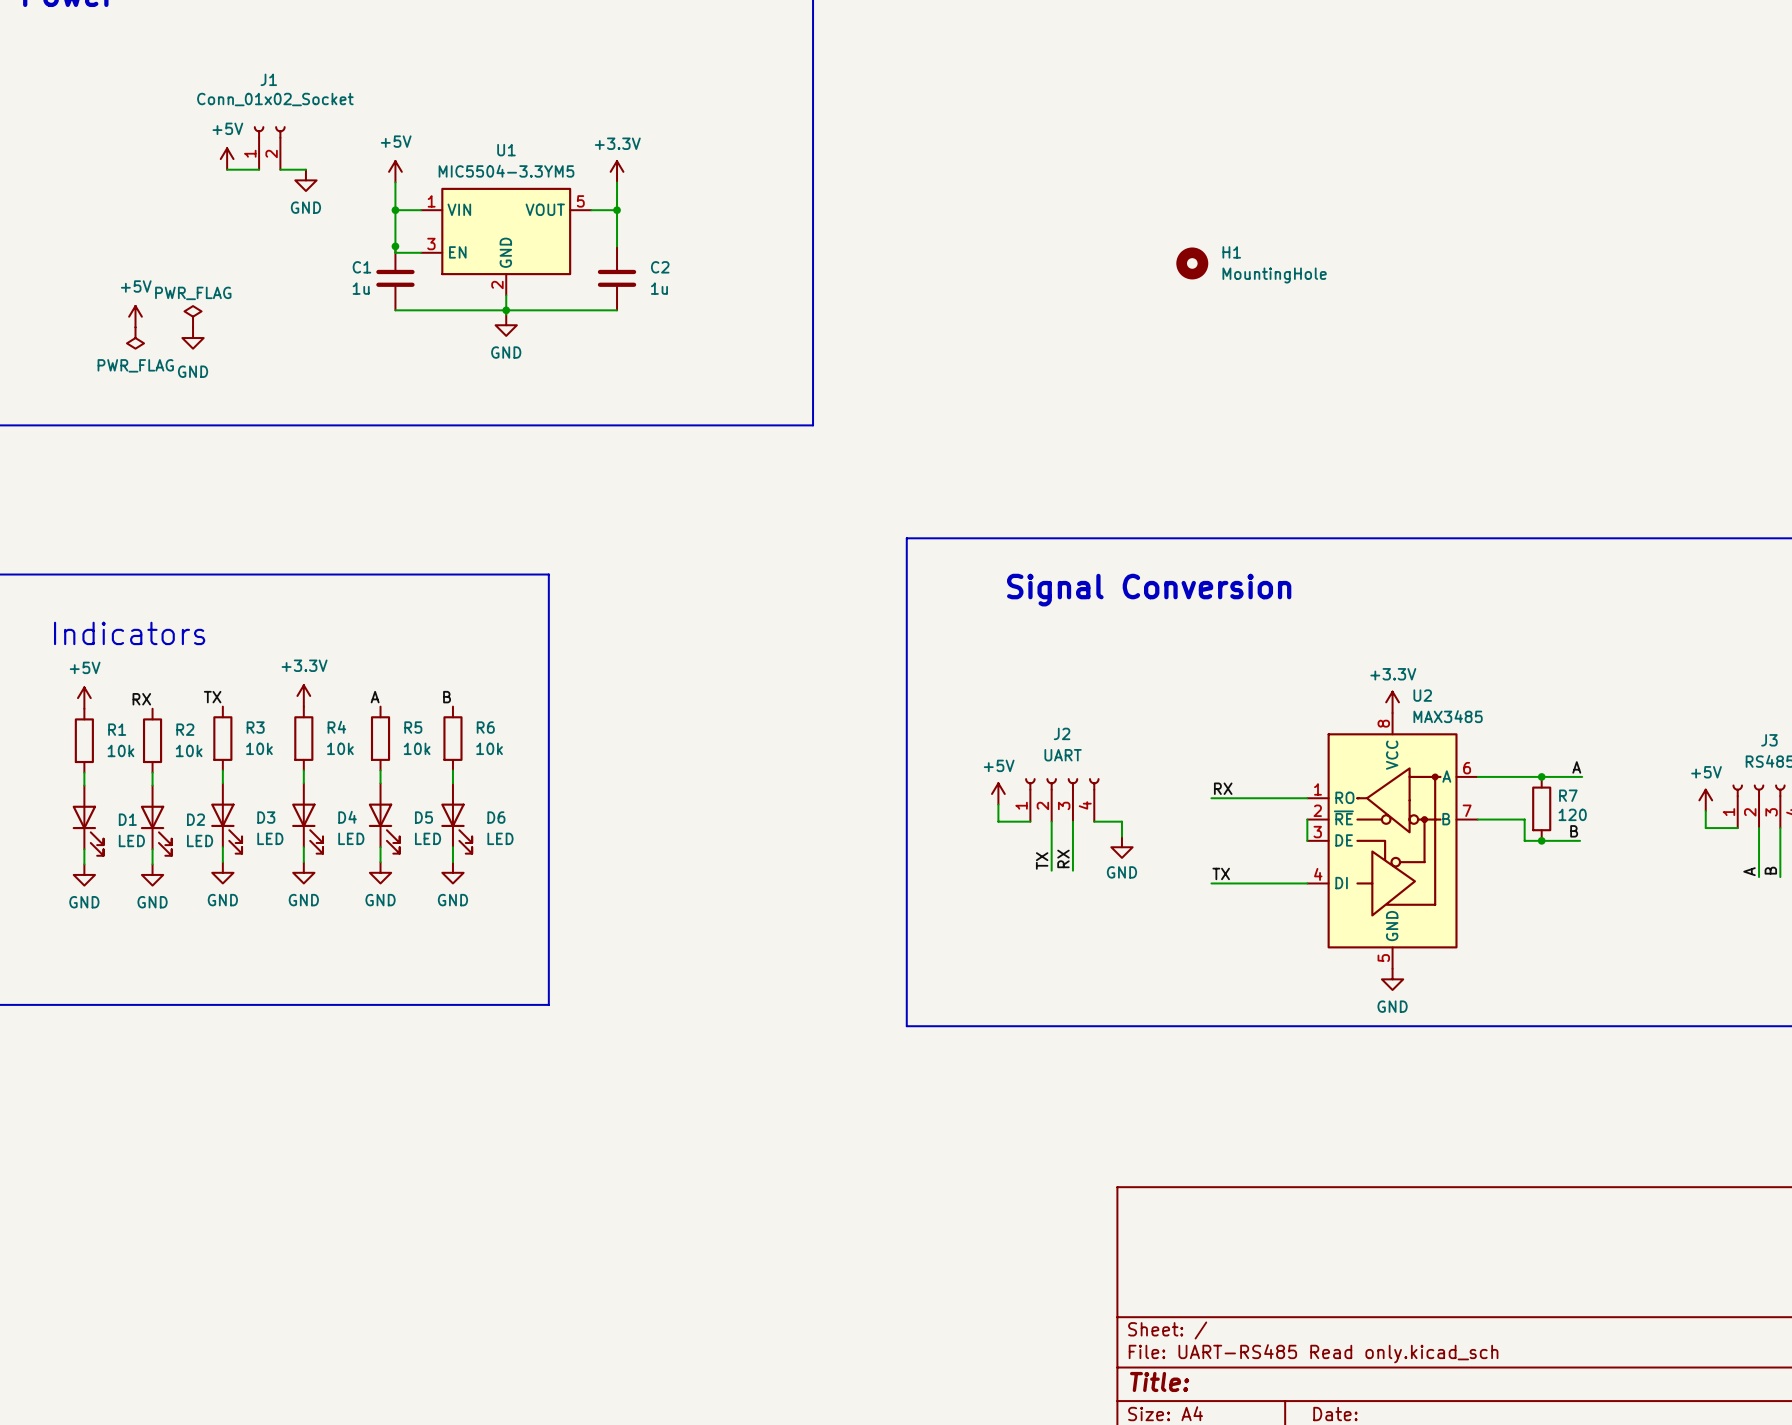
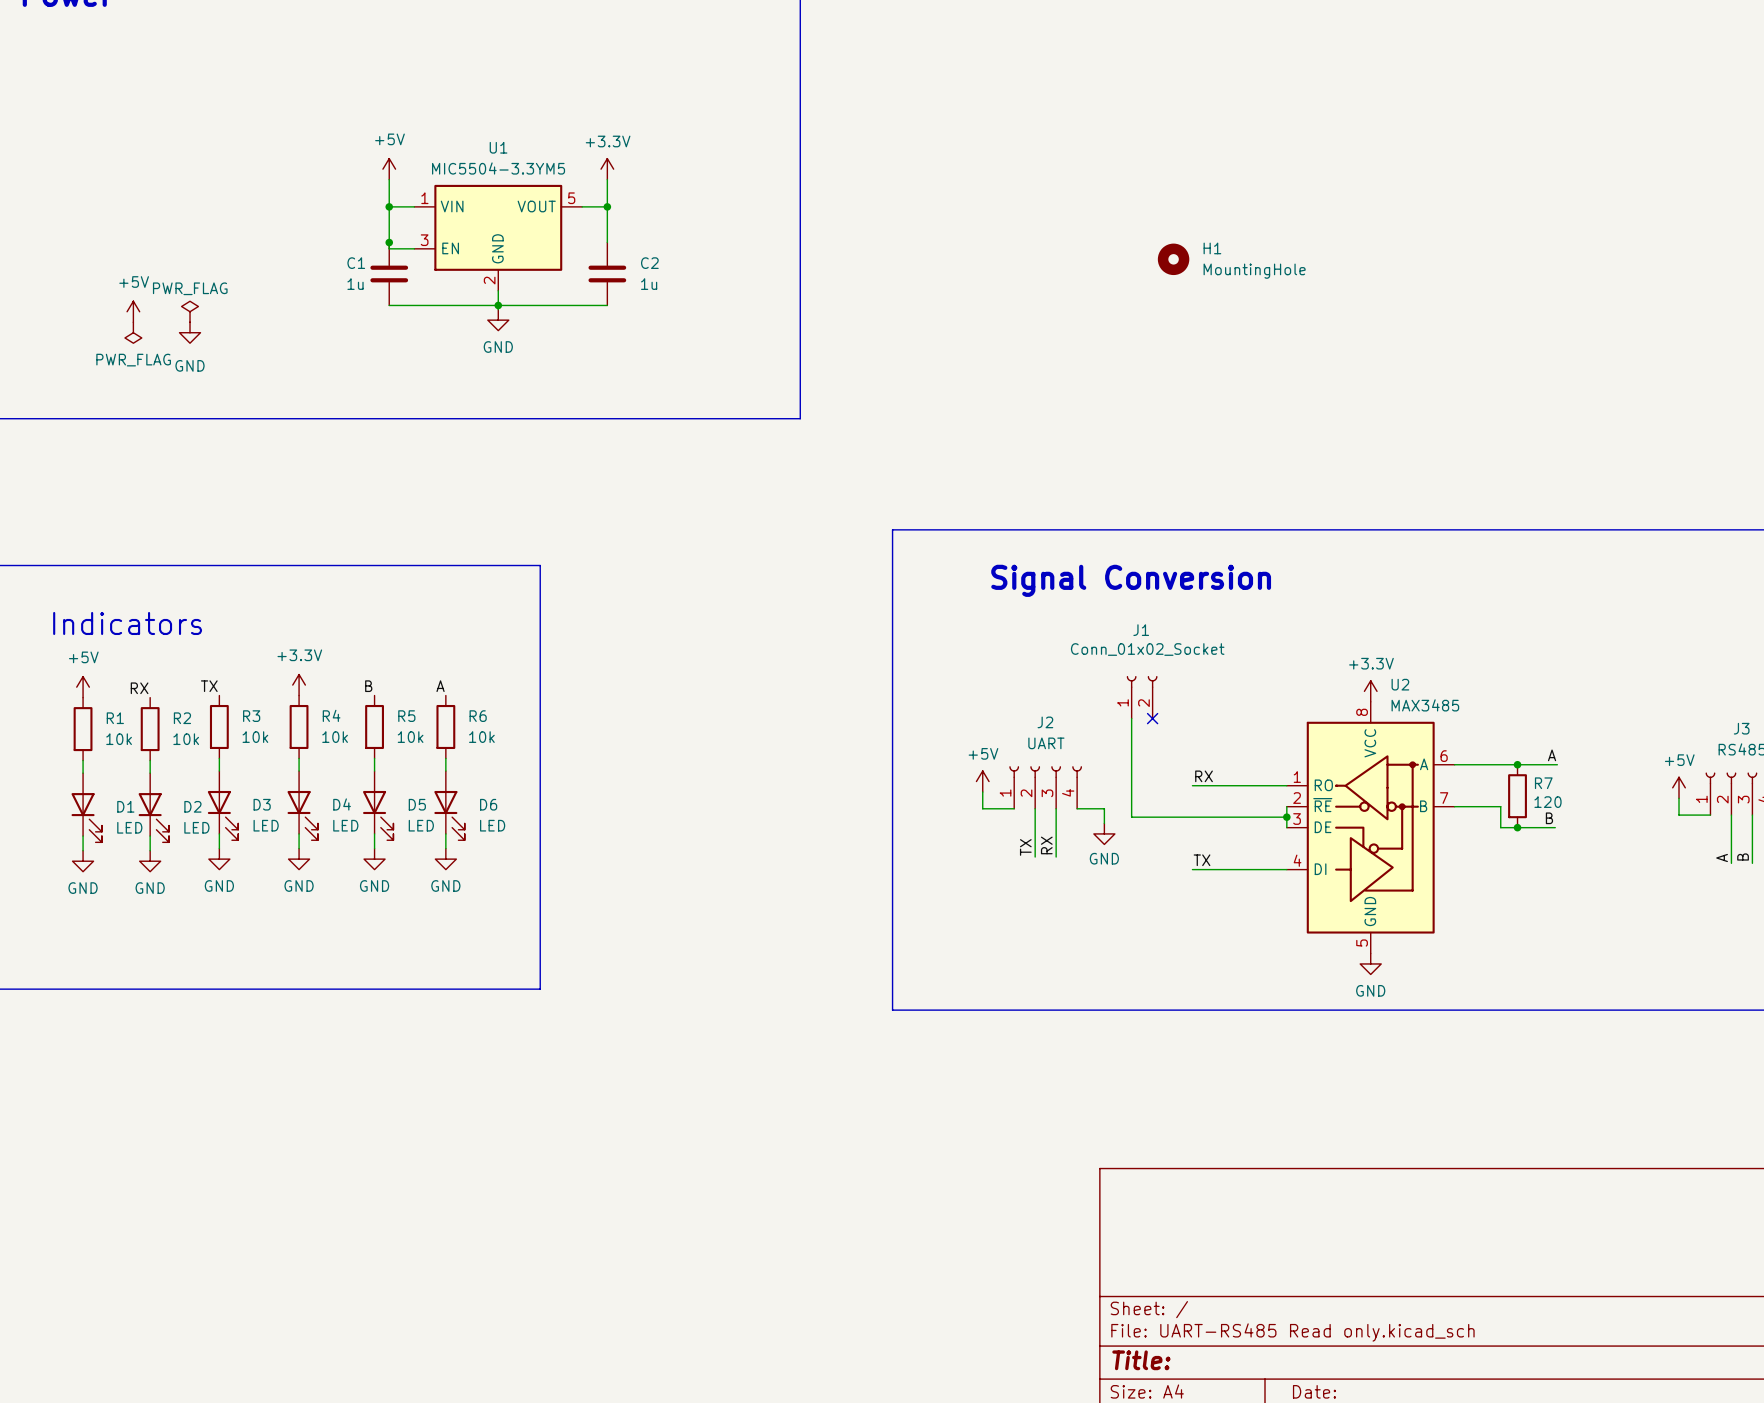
J1 position: (269, 148) -> (1142, 697)
power symbol: +5V (227, 159) -> none
wire: (227, 169) (259, 169) -> none
wire: (280, 169) (305, 169) -> none
power symbol: GND (305, 180) -> none
label: A (375, 697) -> B (368, 686)
label: B (447, 697) -> A (440, 686)
wire: none -> (1131, 718) (1131, 817) (1286, 817)
no-connect mark: none -> (1152, 718)
junction: none -> (1286, 817)

